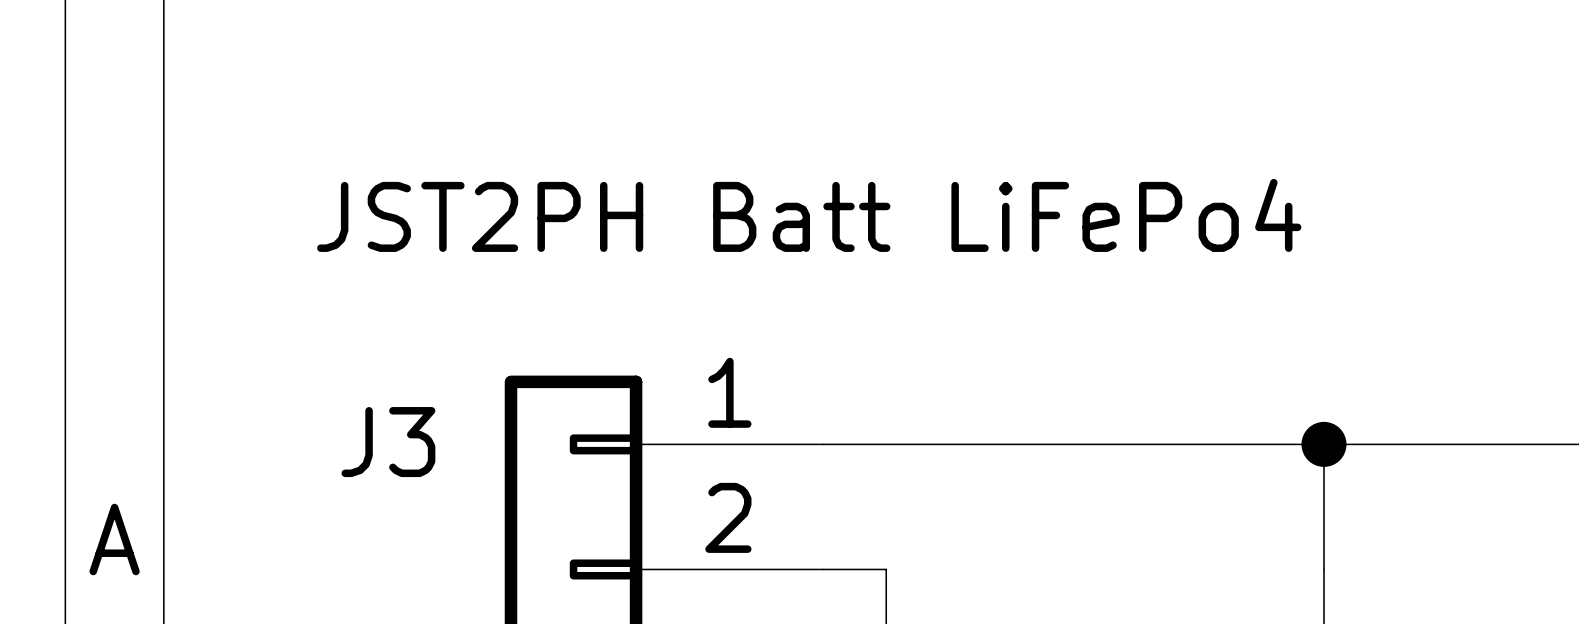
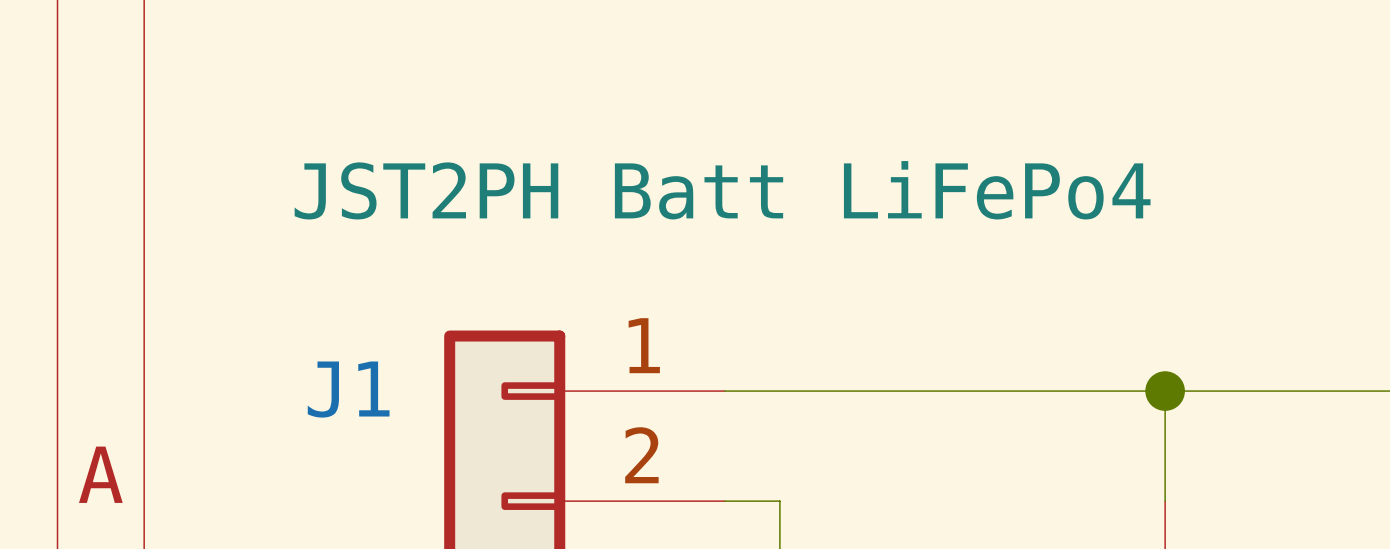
J3 name: J3 (388, 442) -> J1 (348, 389)

